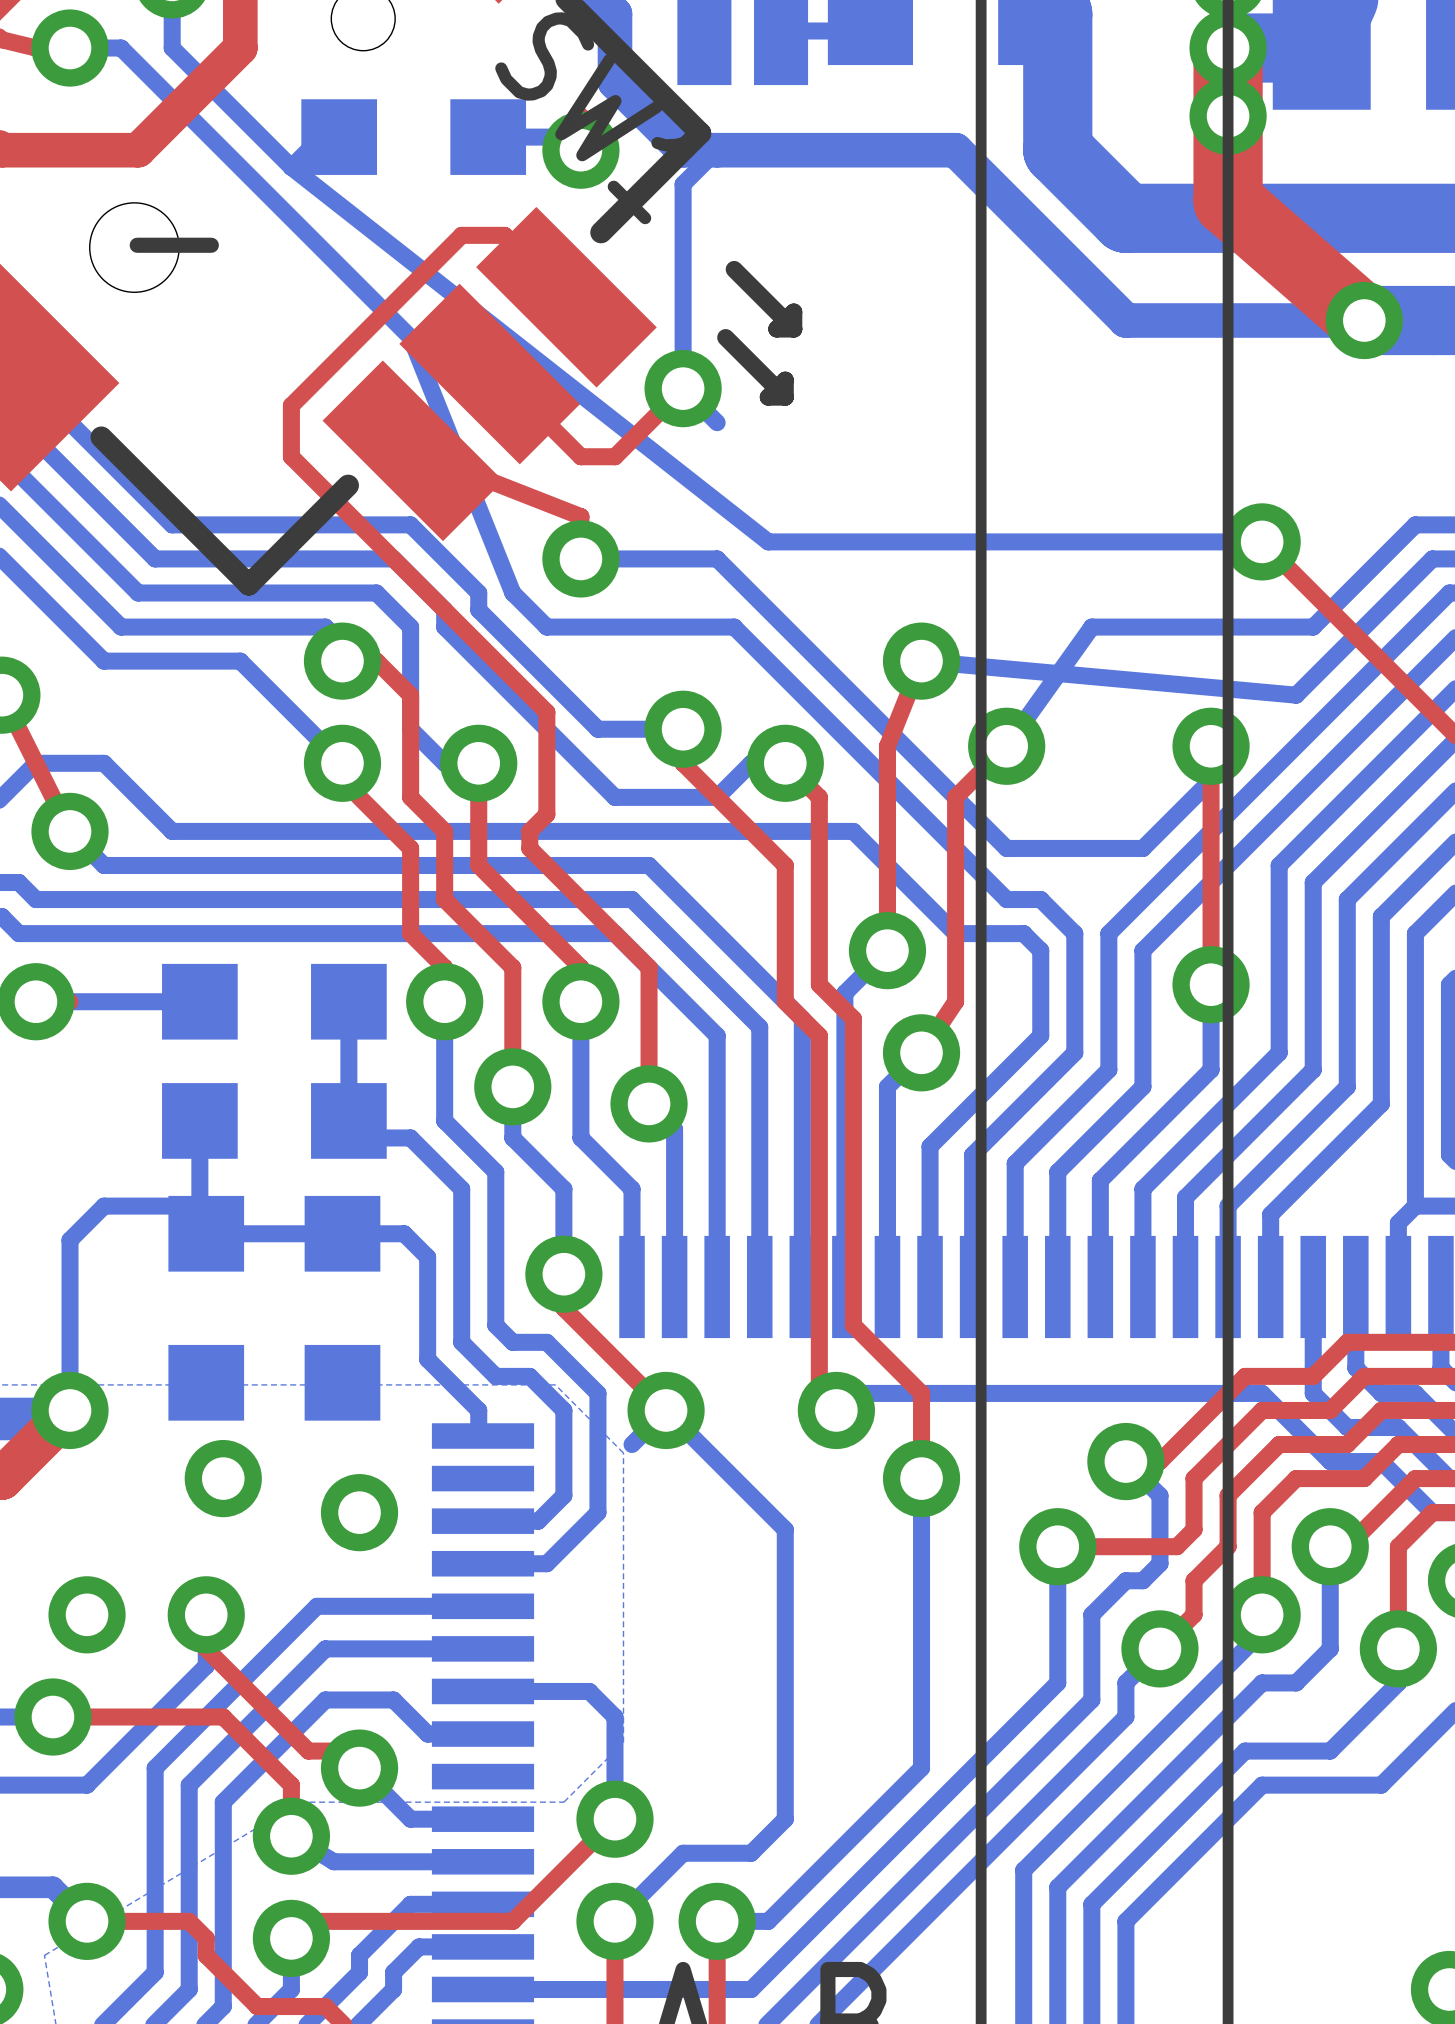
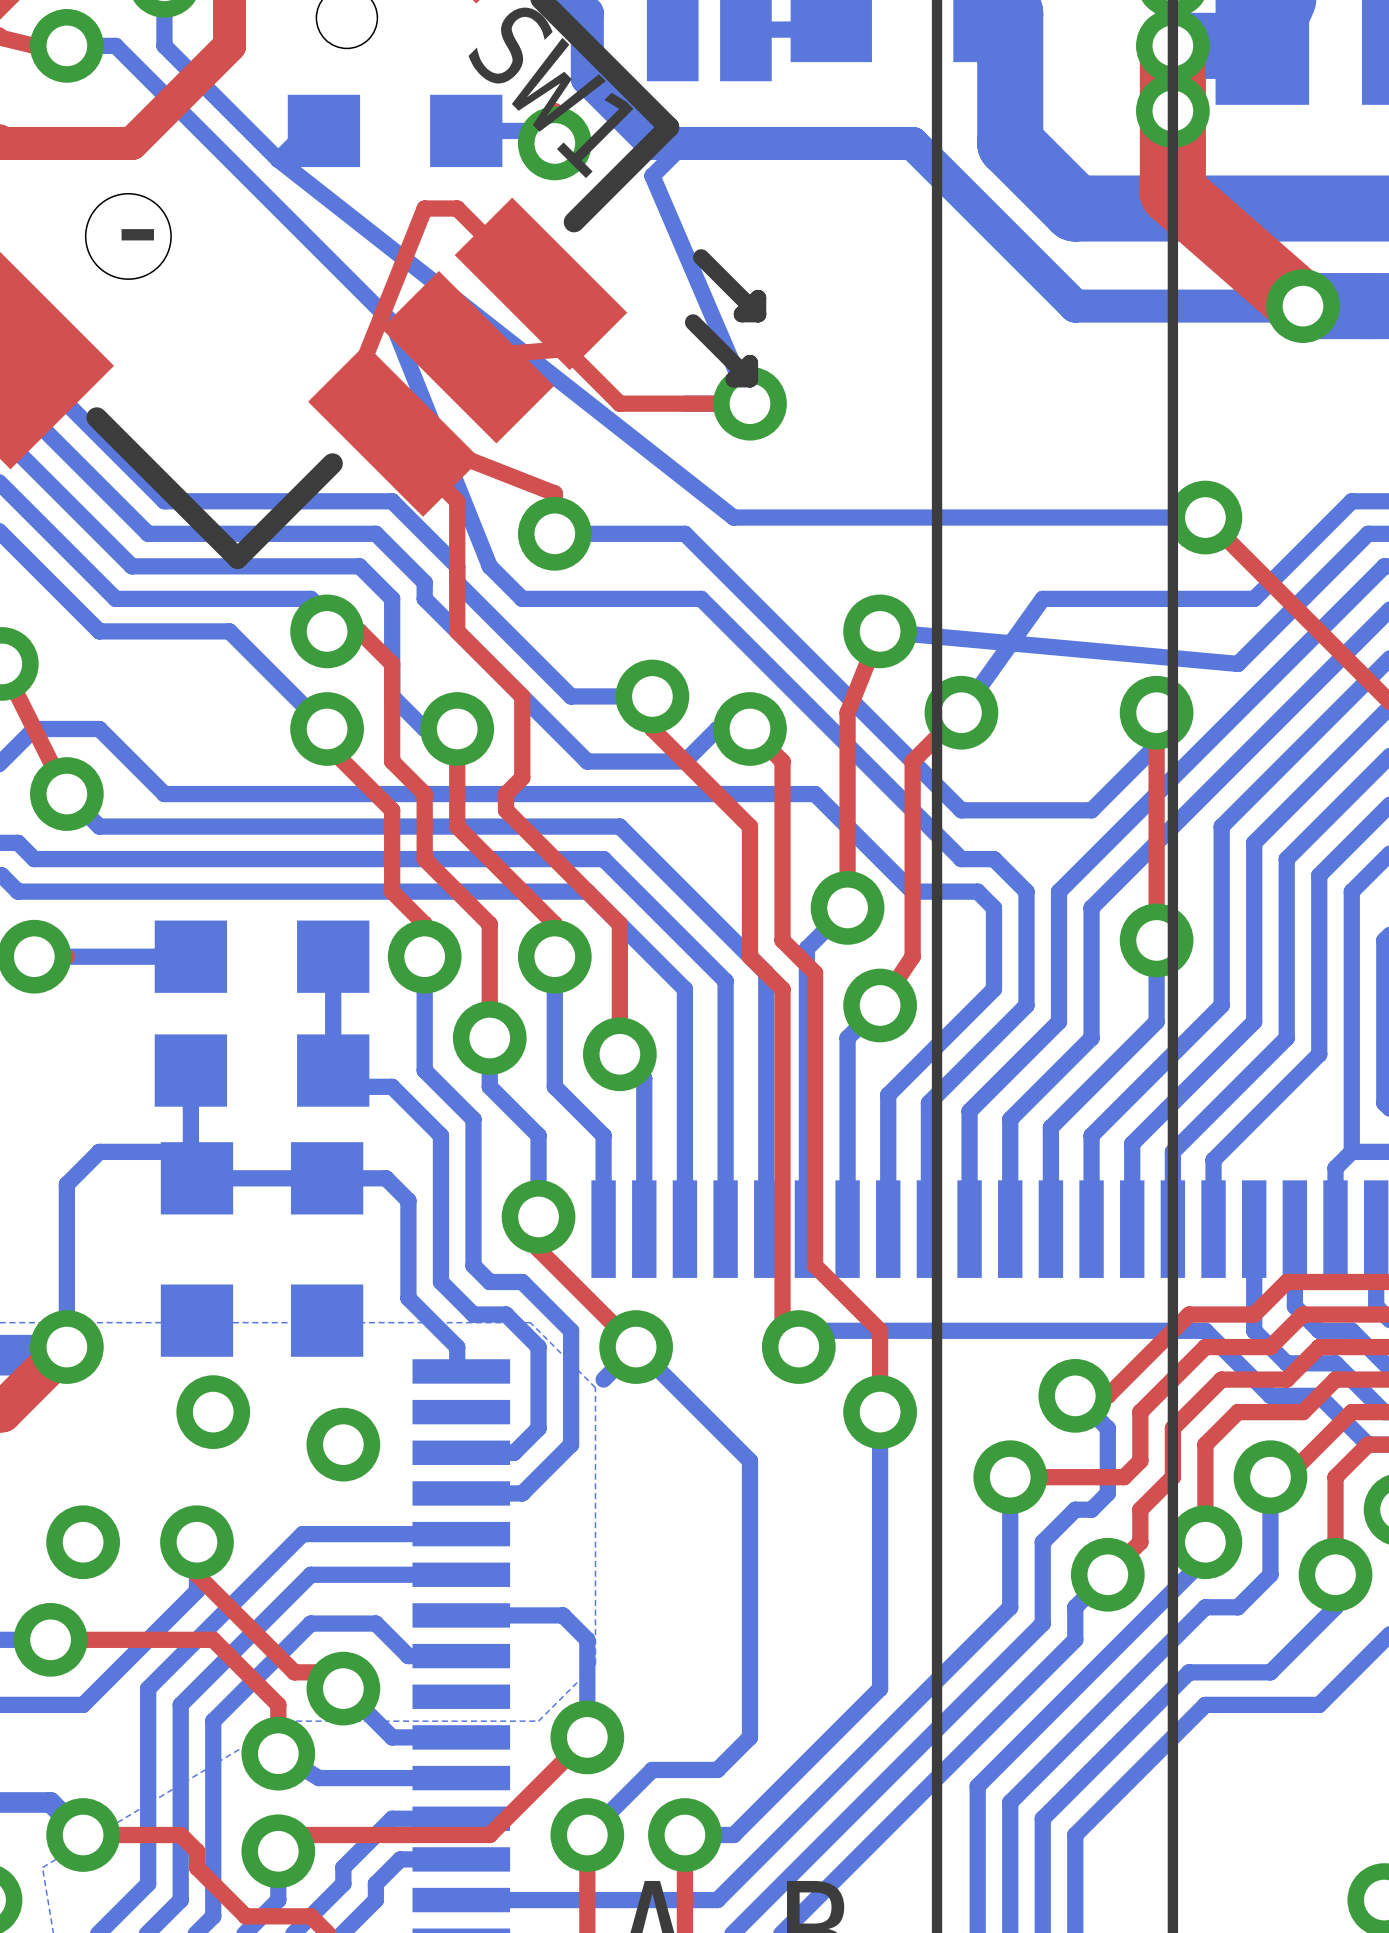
bottom track: (683, 184) (683, 388) (717, 422) -> (652, 175) (749, 403) (684, 403)
top track: (566, 297) (504, 235) (461, 235) (291, 405) (291, 456) (546, 712) (546, 729) -> (540, 283) (532, 283) (457, 208) (424, 208) (359, 371) (359, 403) (457, 501) (457, 631) (522, 696)
top track: (489, 374) (498, 374) (580, 456) (614, 456) (683, 388) -> (467, 357) (565, 349) (619, 403) (749, 403)
via position: (683, 388) -> (749, 403)

